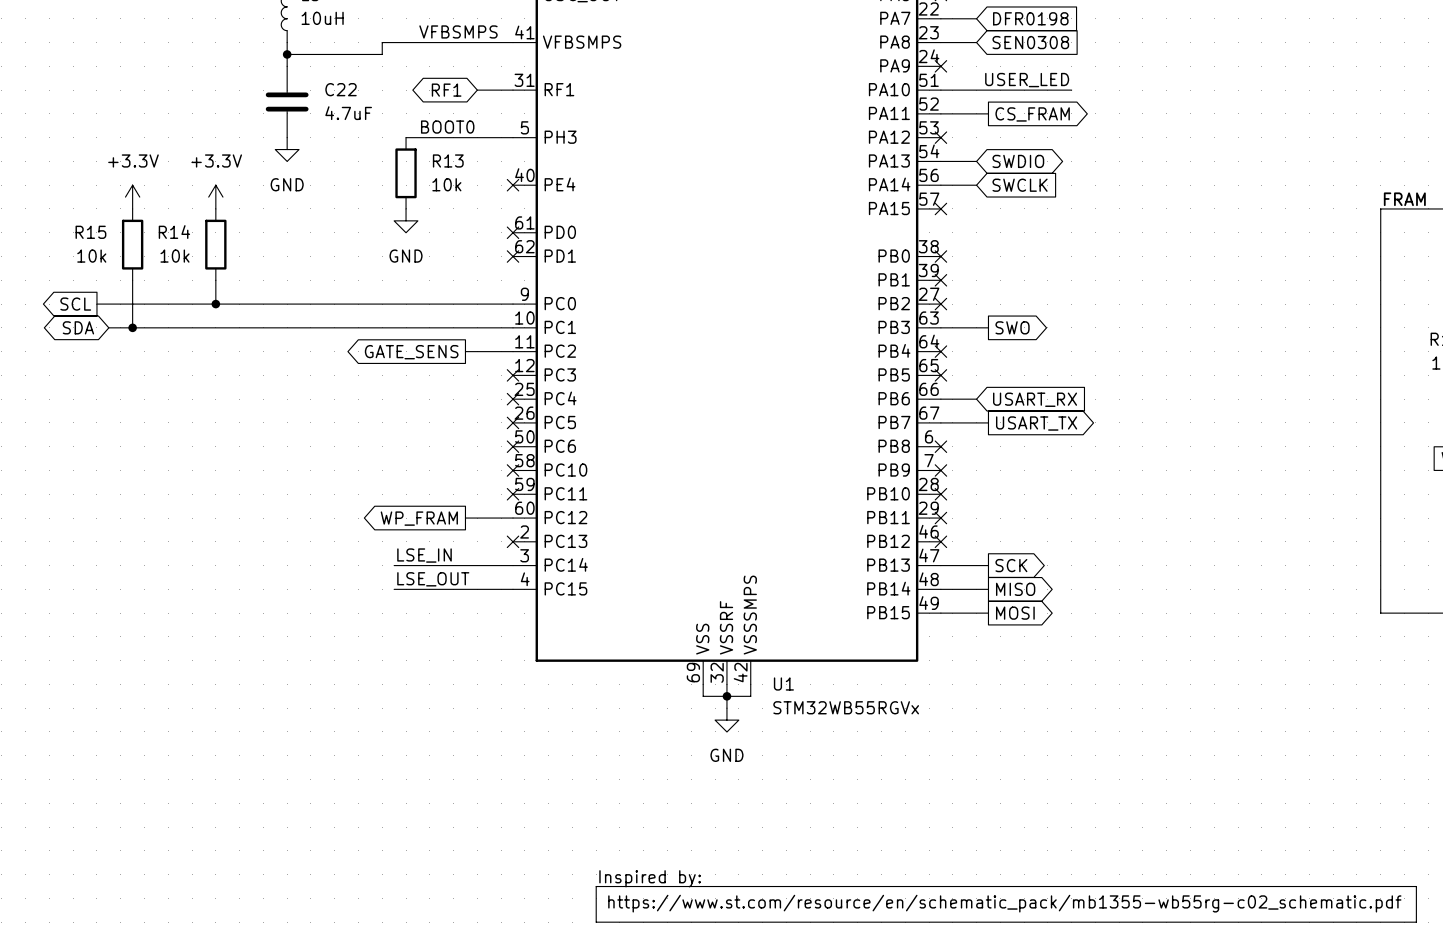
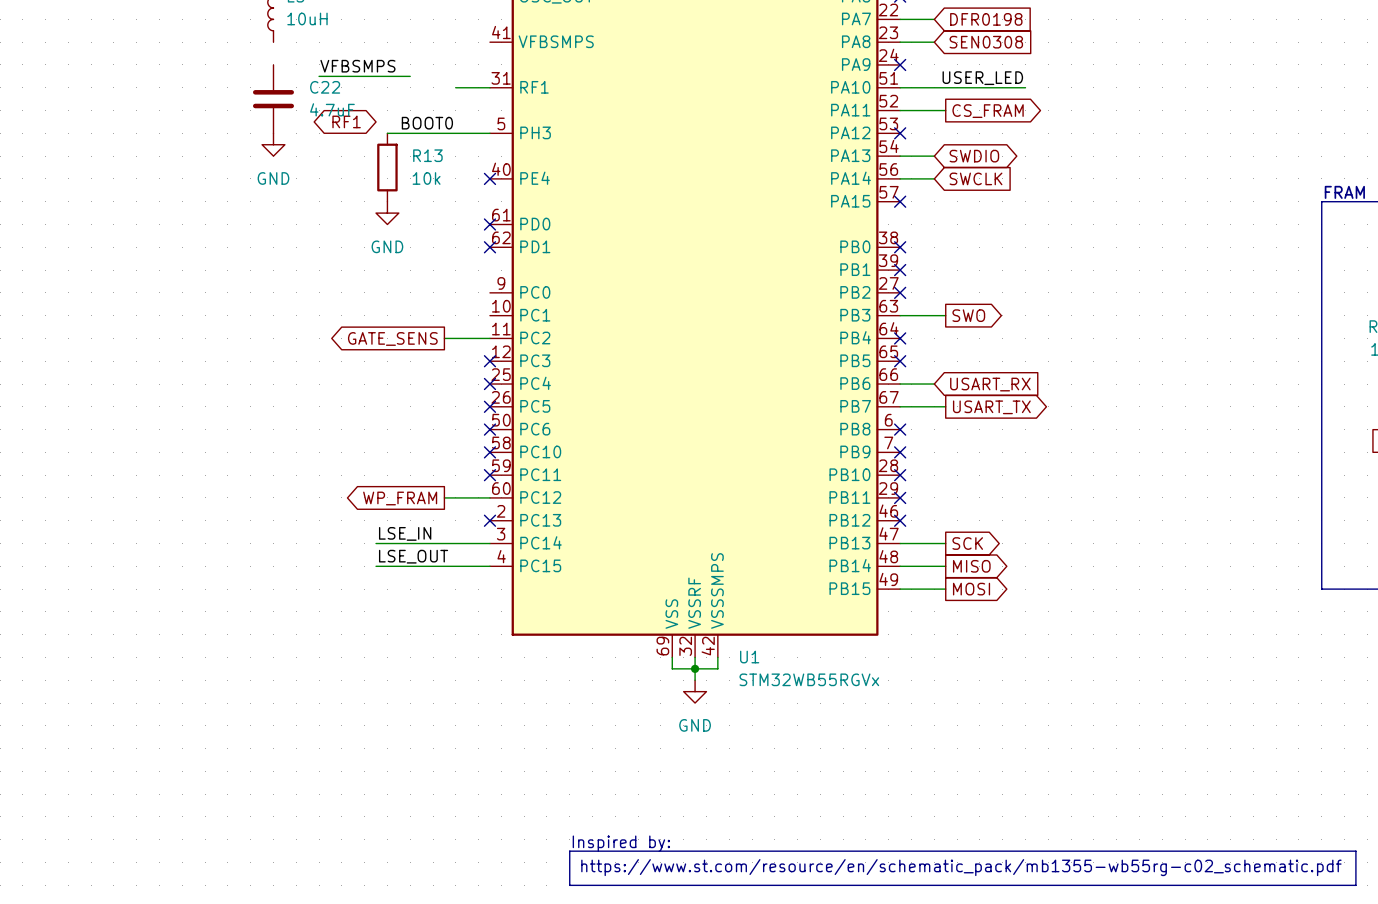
label position: VFBSMPS (458, 31) -> VFBSMPS (357, 66)
wire: (287, 42) (287, 66) -> none
wire: (513, 42) (382, 42) (382, 54) (287, 54) -> none
junction: (287, 54) -> none
wire: none -> (319, 76) (410, 76)
global label position: RF1 (446, 90) -> RF1 (346, 121)
power symbol: +3.3V (132, 197) -> none
power symbol: +3.3V (215, 197) -> none
R15: 10k (132, 244) -> none
R14: 10k (215, 244) -> none
wire: (132, 280) (132, 327) -> none
wire: (215, 280) (215, 304) -> none
global label: SCL (75, 304) -> none
wire: (96, 304) (513, 304) -> none
junction: (215, 304) -> none
global label: SDA (78, 327) -> none
wire: (108, 327) (513, 327) -> none
junction: (132, 327) -> none

